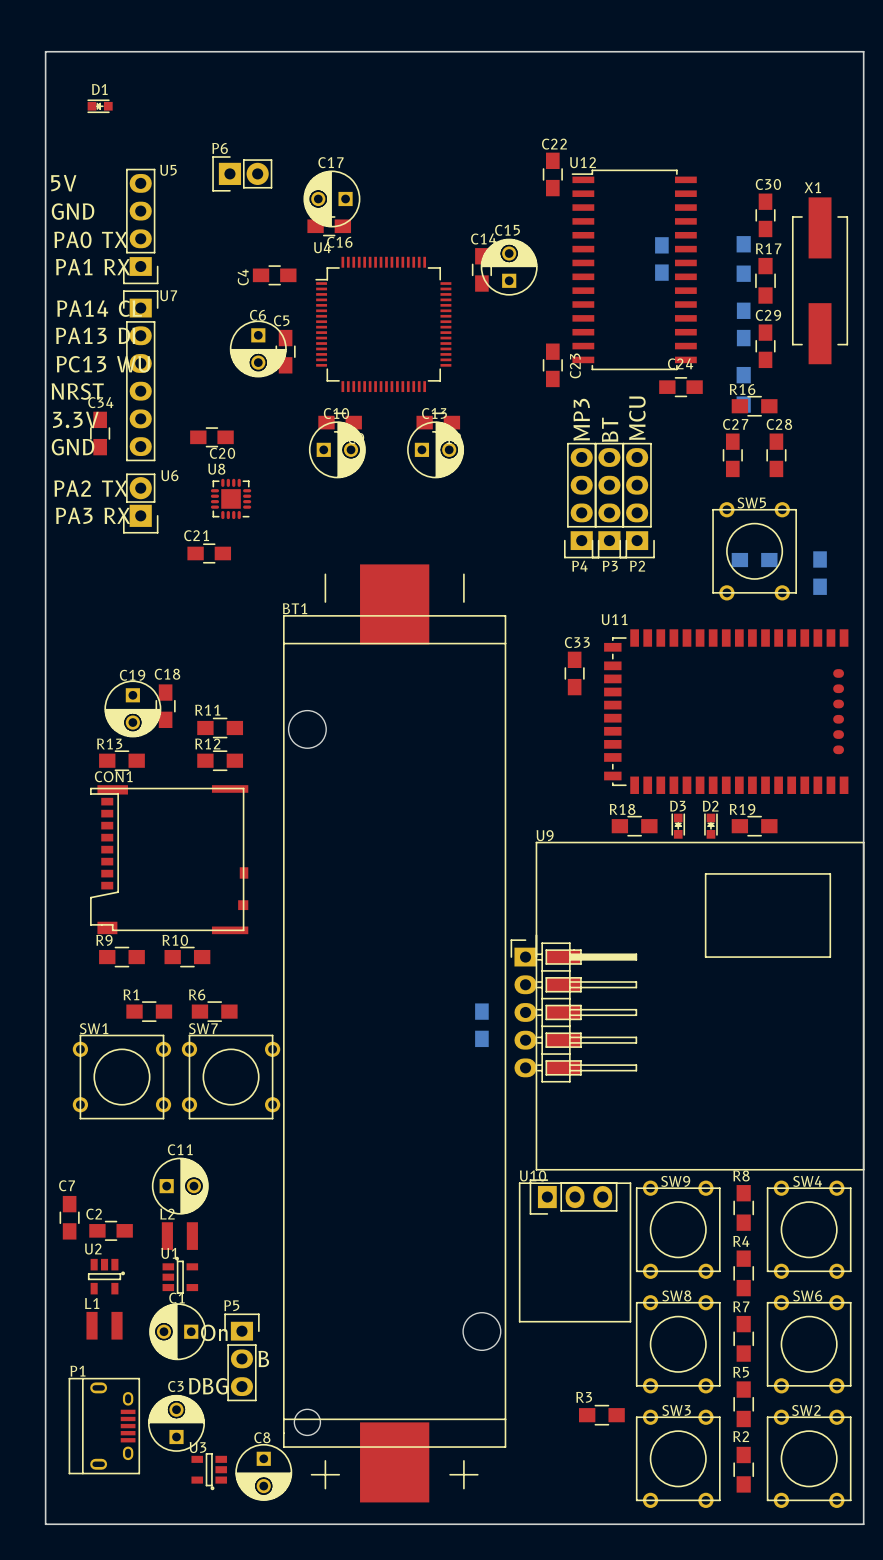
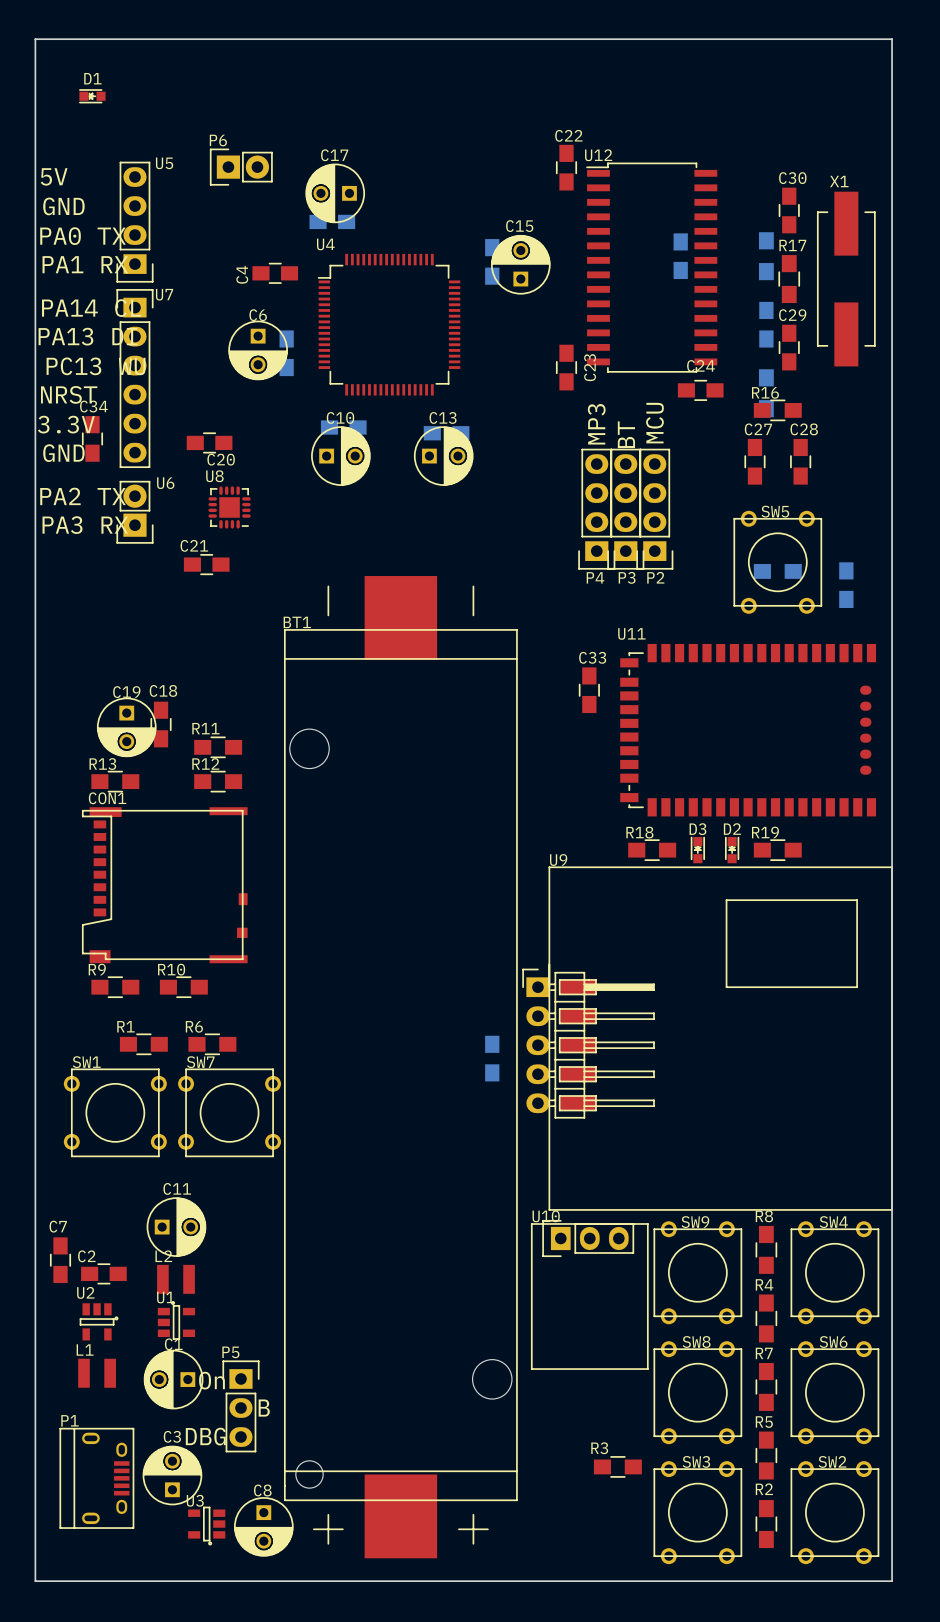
C16 side: top (329, 226) -> bottom (332, 221)
C14 side: top (481, 269) -> bottom (492, 261)
C5 side: top (285, 351) -> bottom (286, 353)
part side: top (340, 422) -> bottom (343, 427)
part side: top (438, 422) -> bottom (446, 433)

